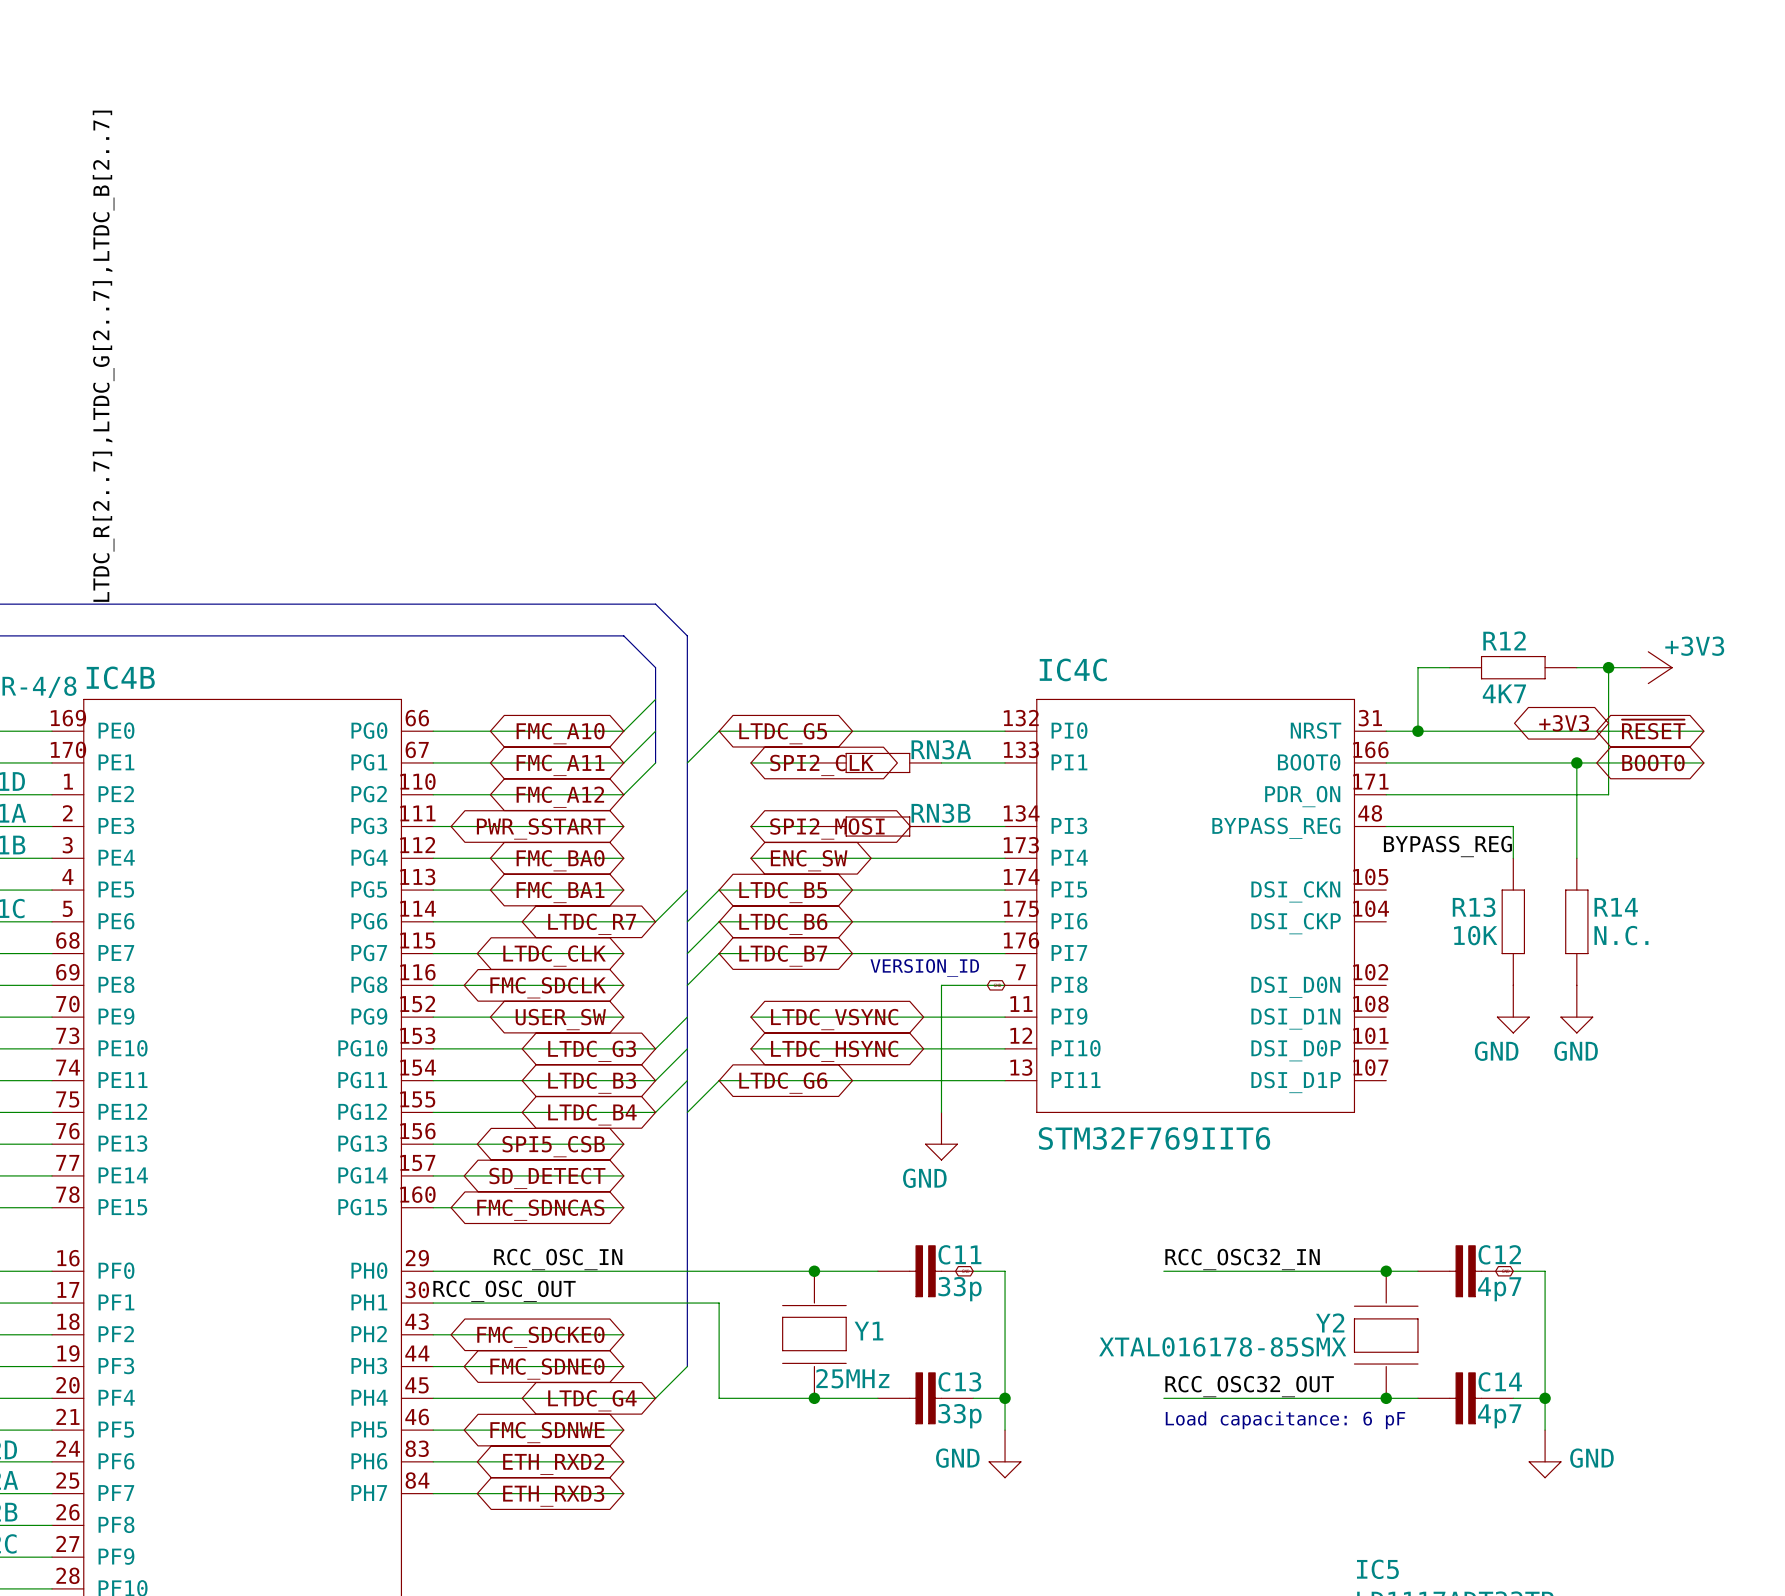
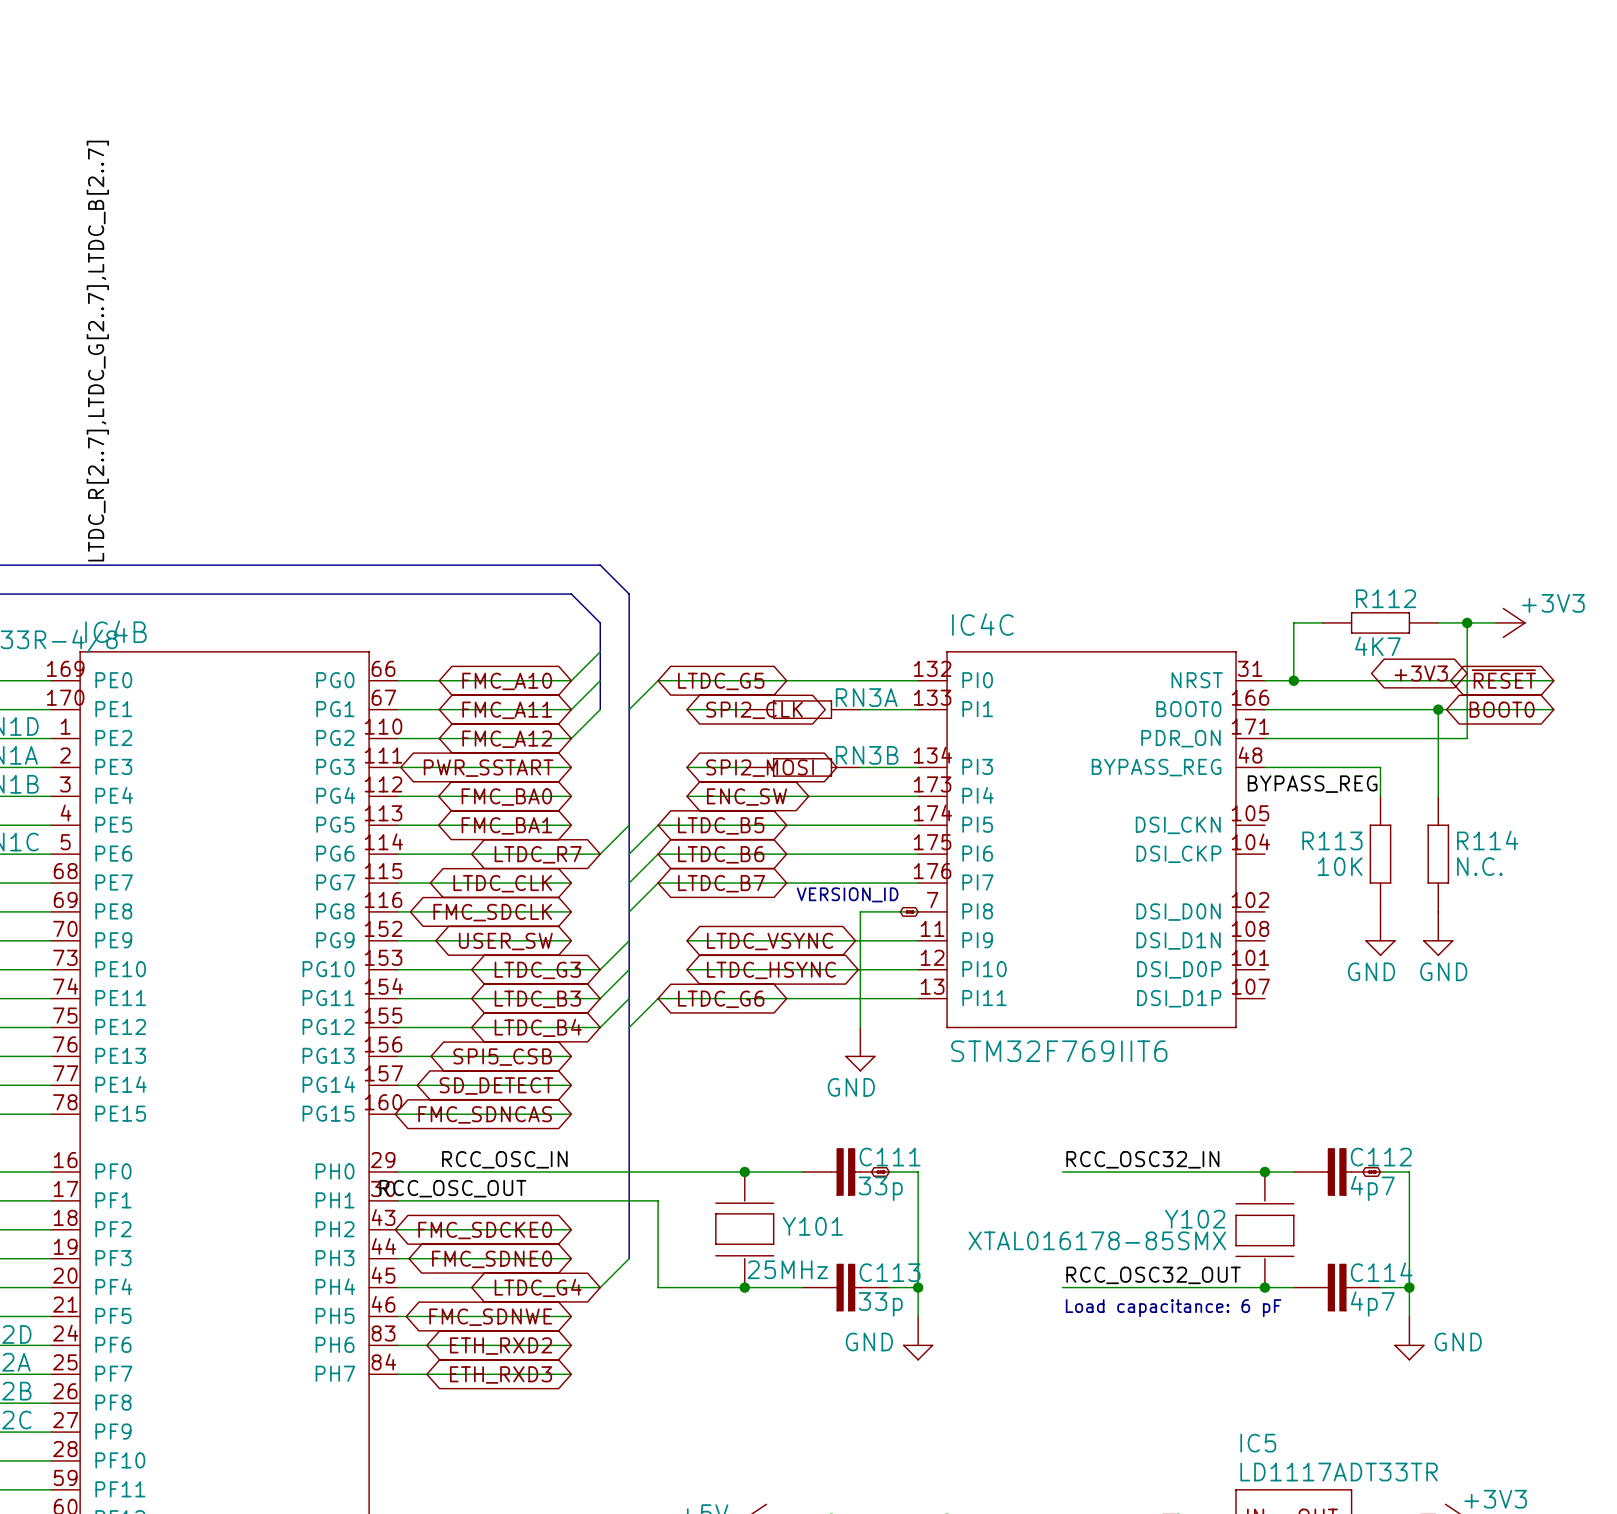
R12 name: R12 (1504, 640) -> R112 (1386, 598)
R13 name: R13 (1474, 907) -> R113 (1332, 840)
R14 name: R14 (1616, 907) -> R114 (1487, 840)
C11 name: C11 (959, 1254) -> C111 (890, 1157)
C12 name: C12 (1499, 1254) -> C112 (1381, 1157)
Y2 name: Y2 (1330, 1322) -> Y102 (1195, 1219)
Y1 name: Y1 (868, 1331) -> Y101 (812, 1226)
C13 name: C13 (959, 1381) -> C113 (890, 1272)
C14 name: C14 (1500, 1381) -> C114 (1381, 1272)

